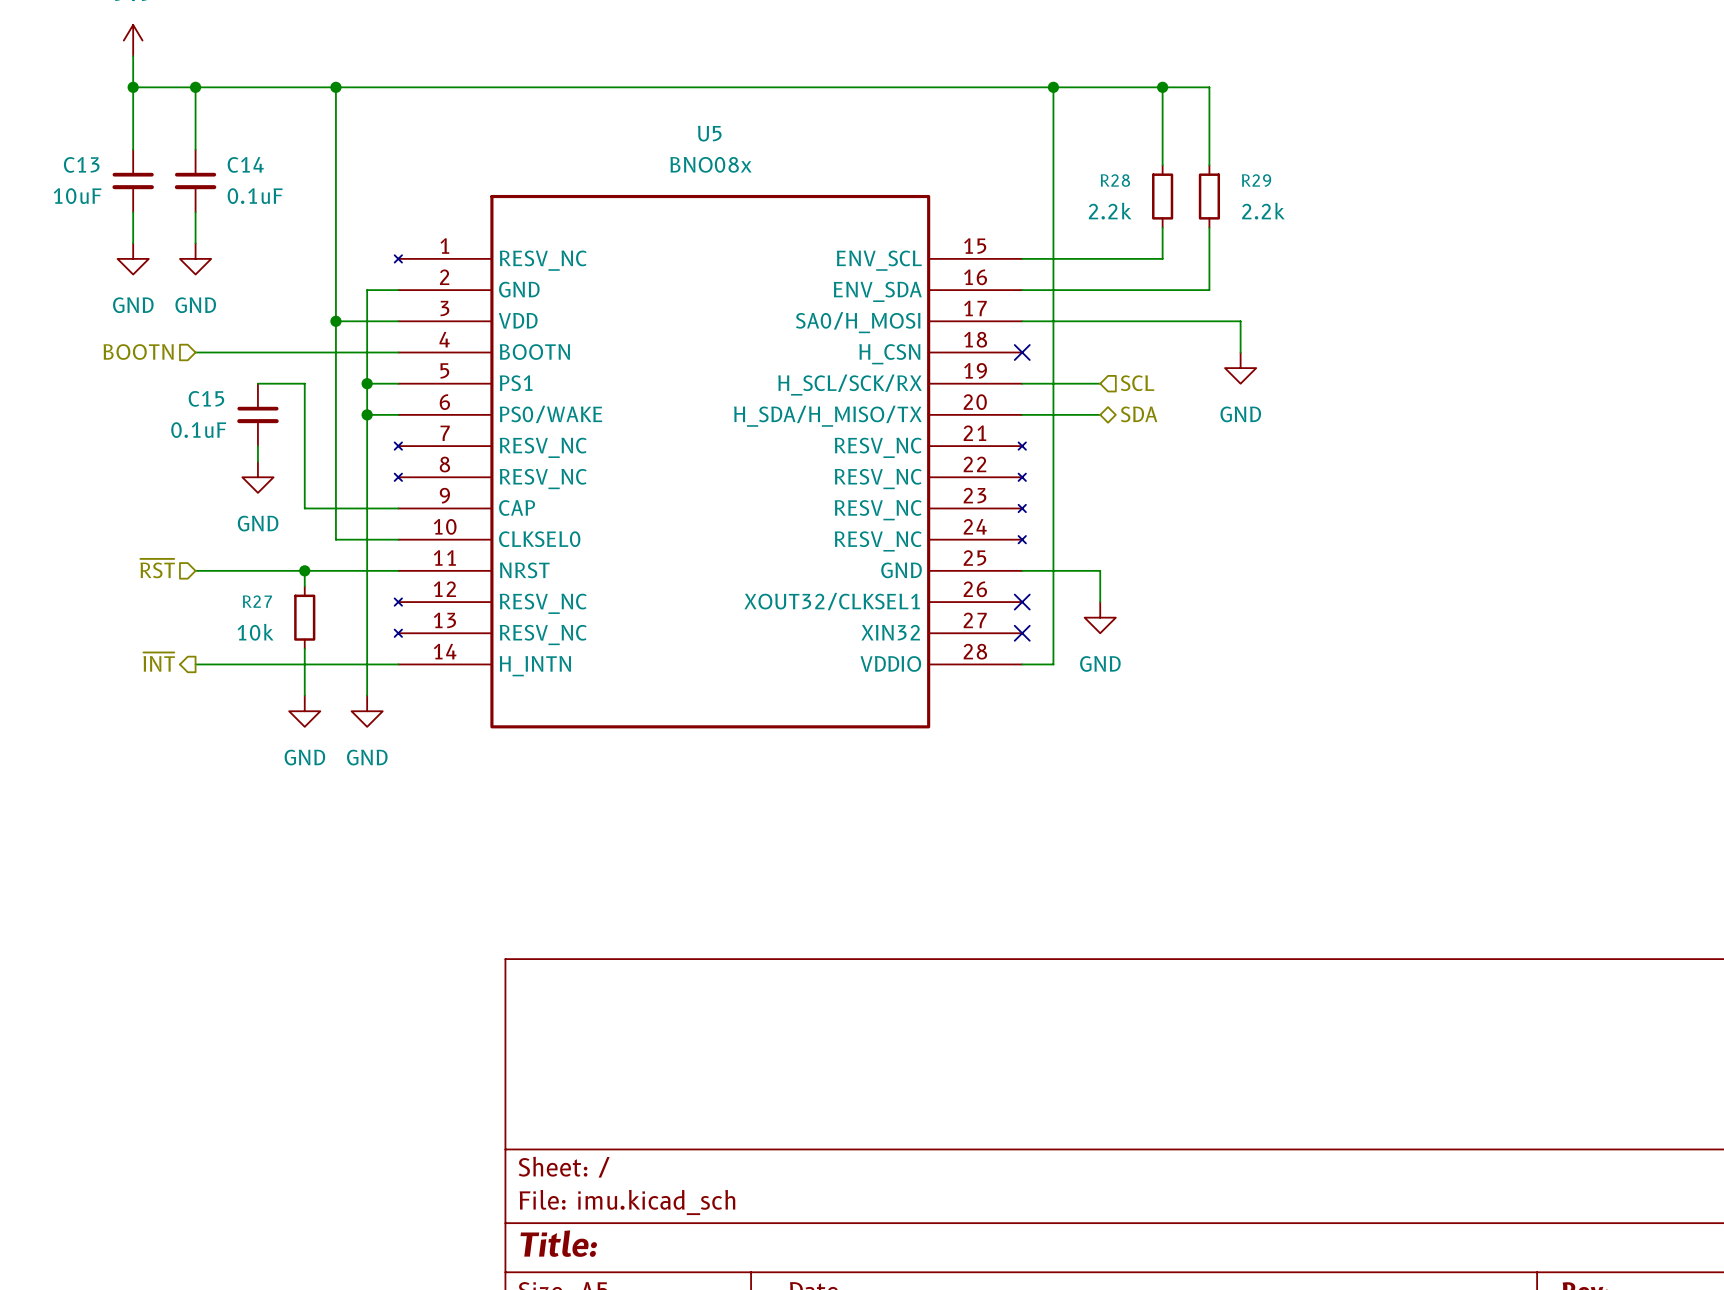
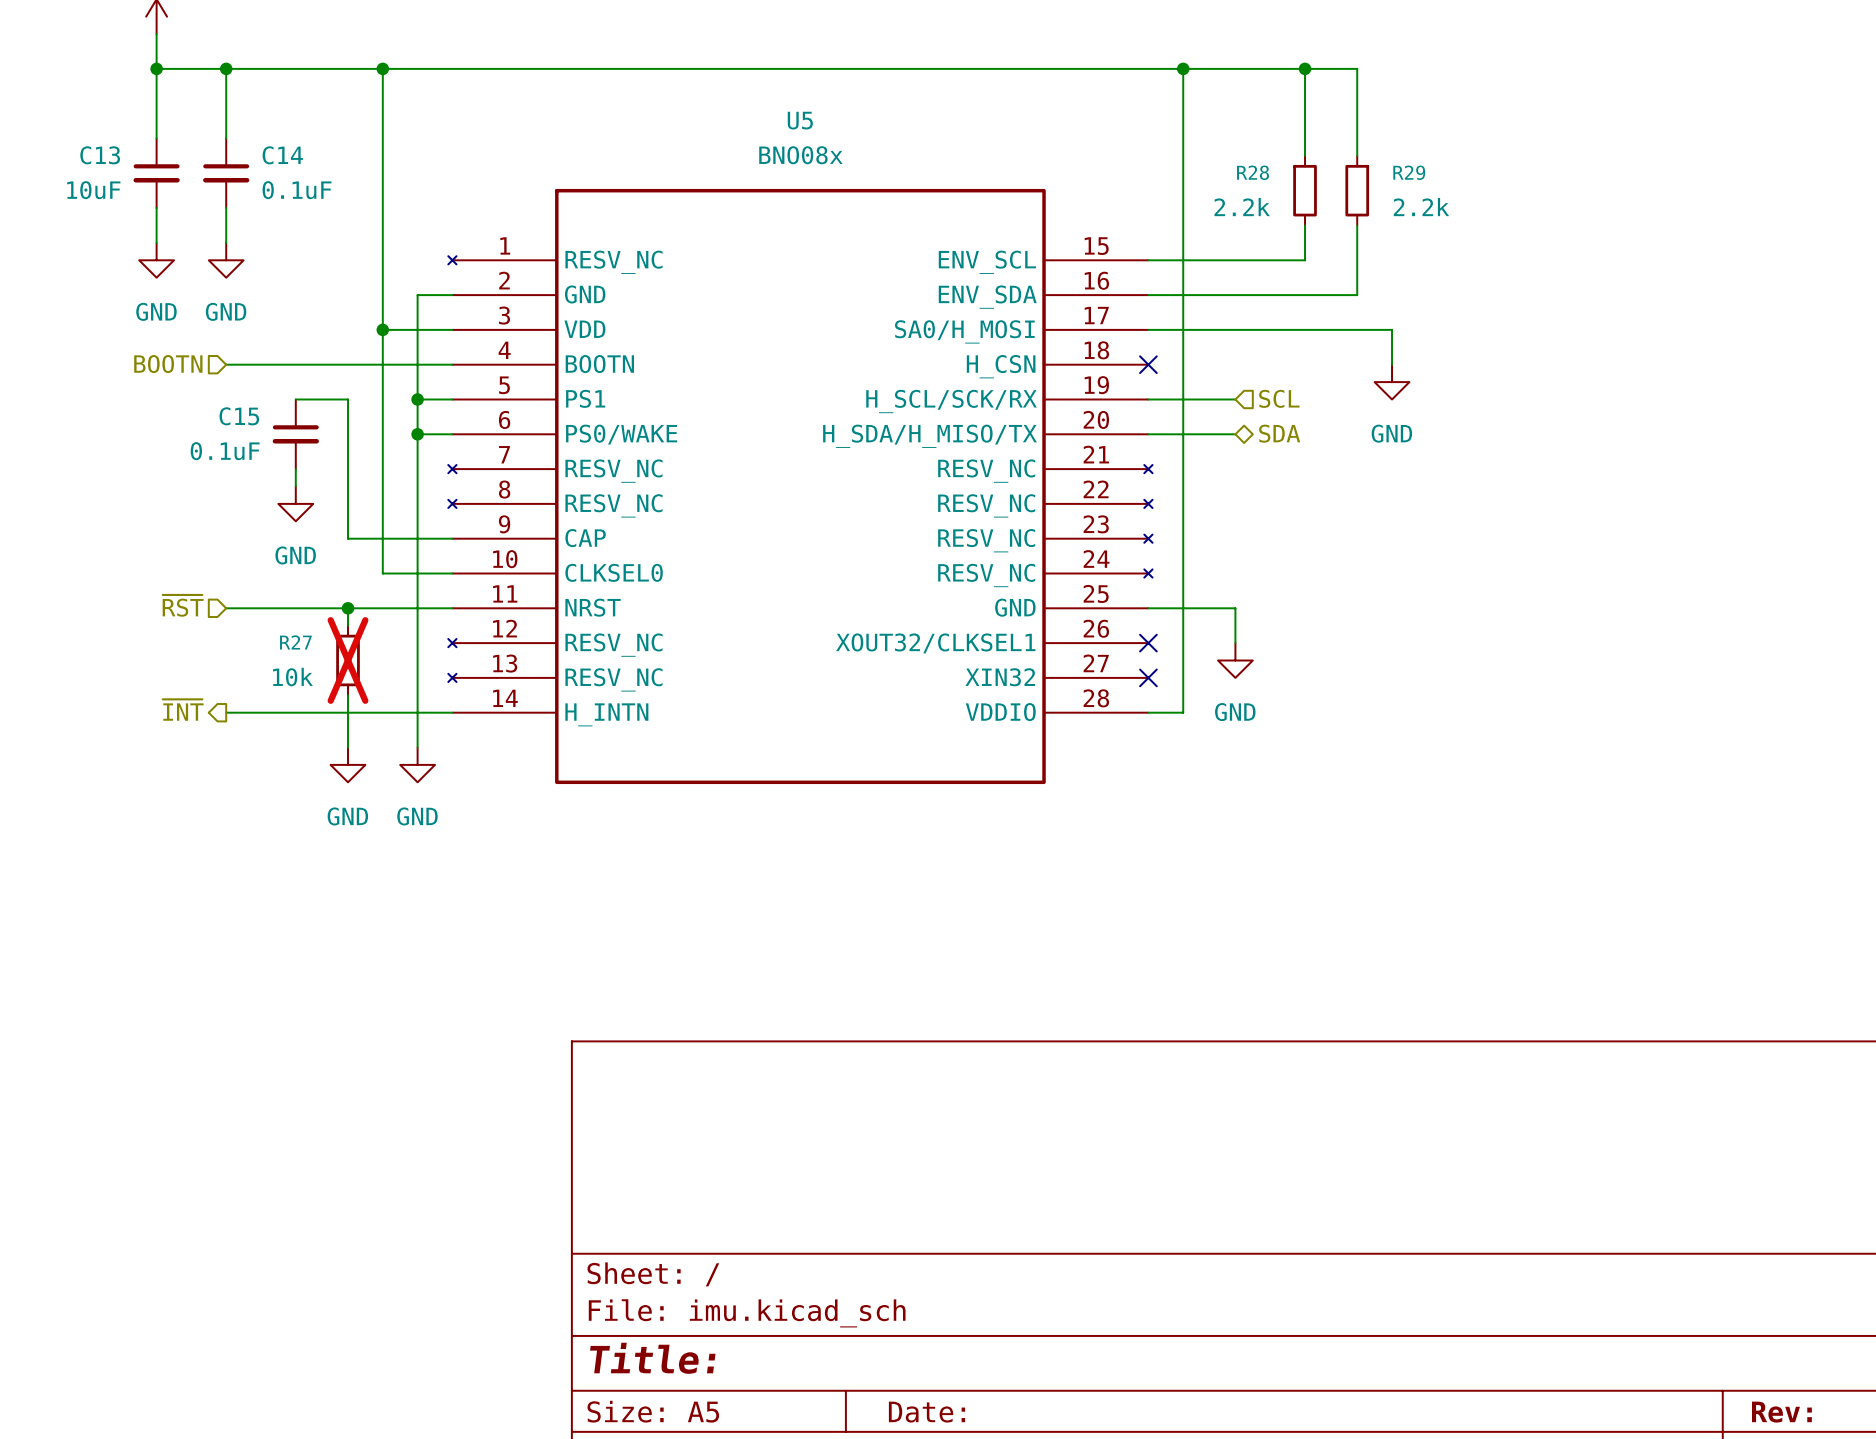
R27 do-not-place cross: none -> (348, 660)

